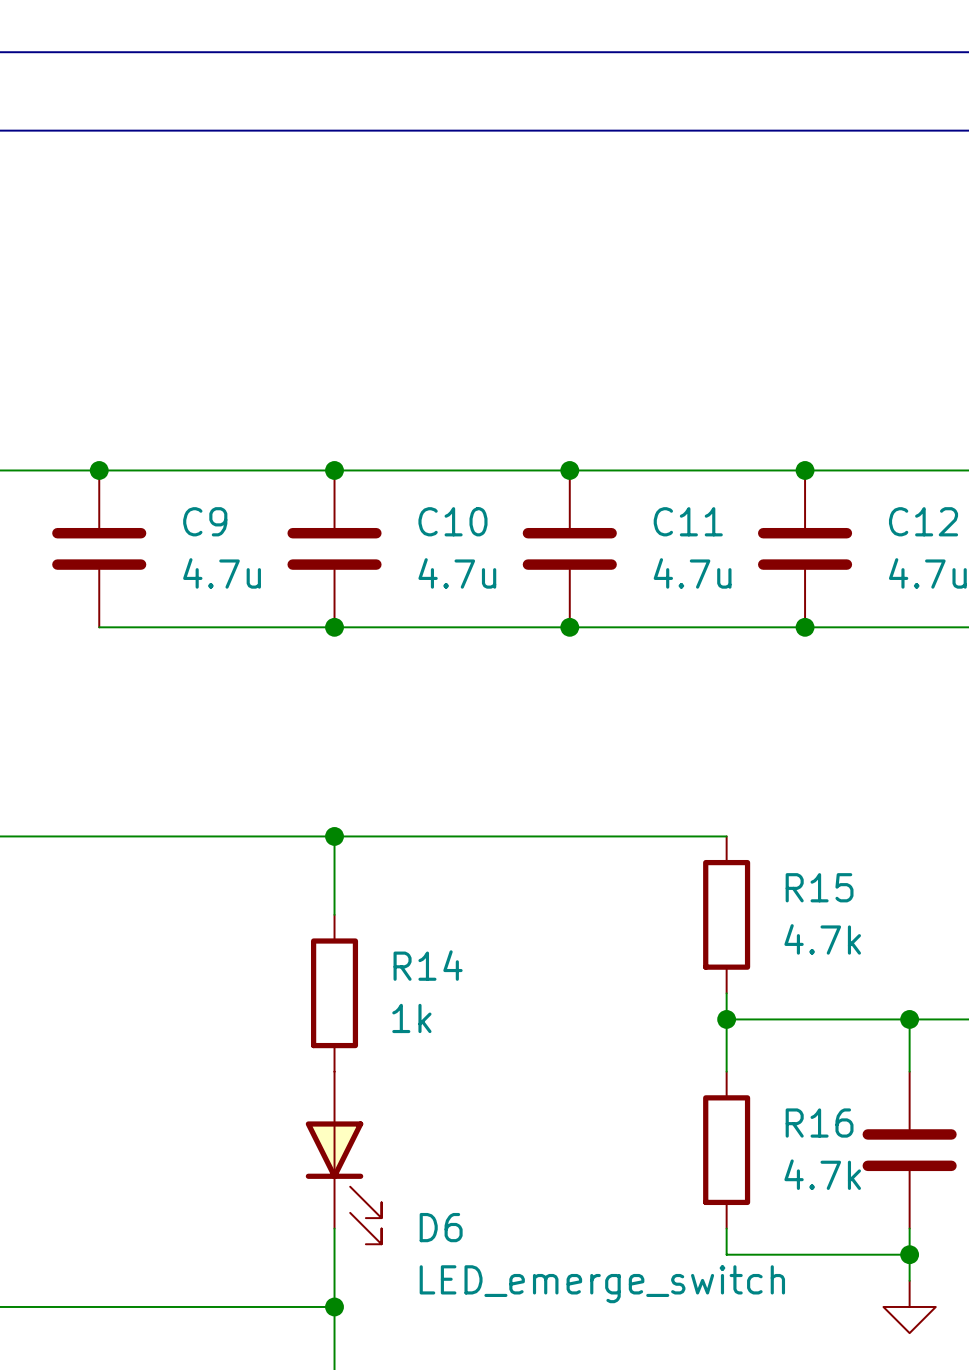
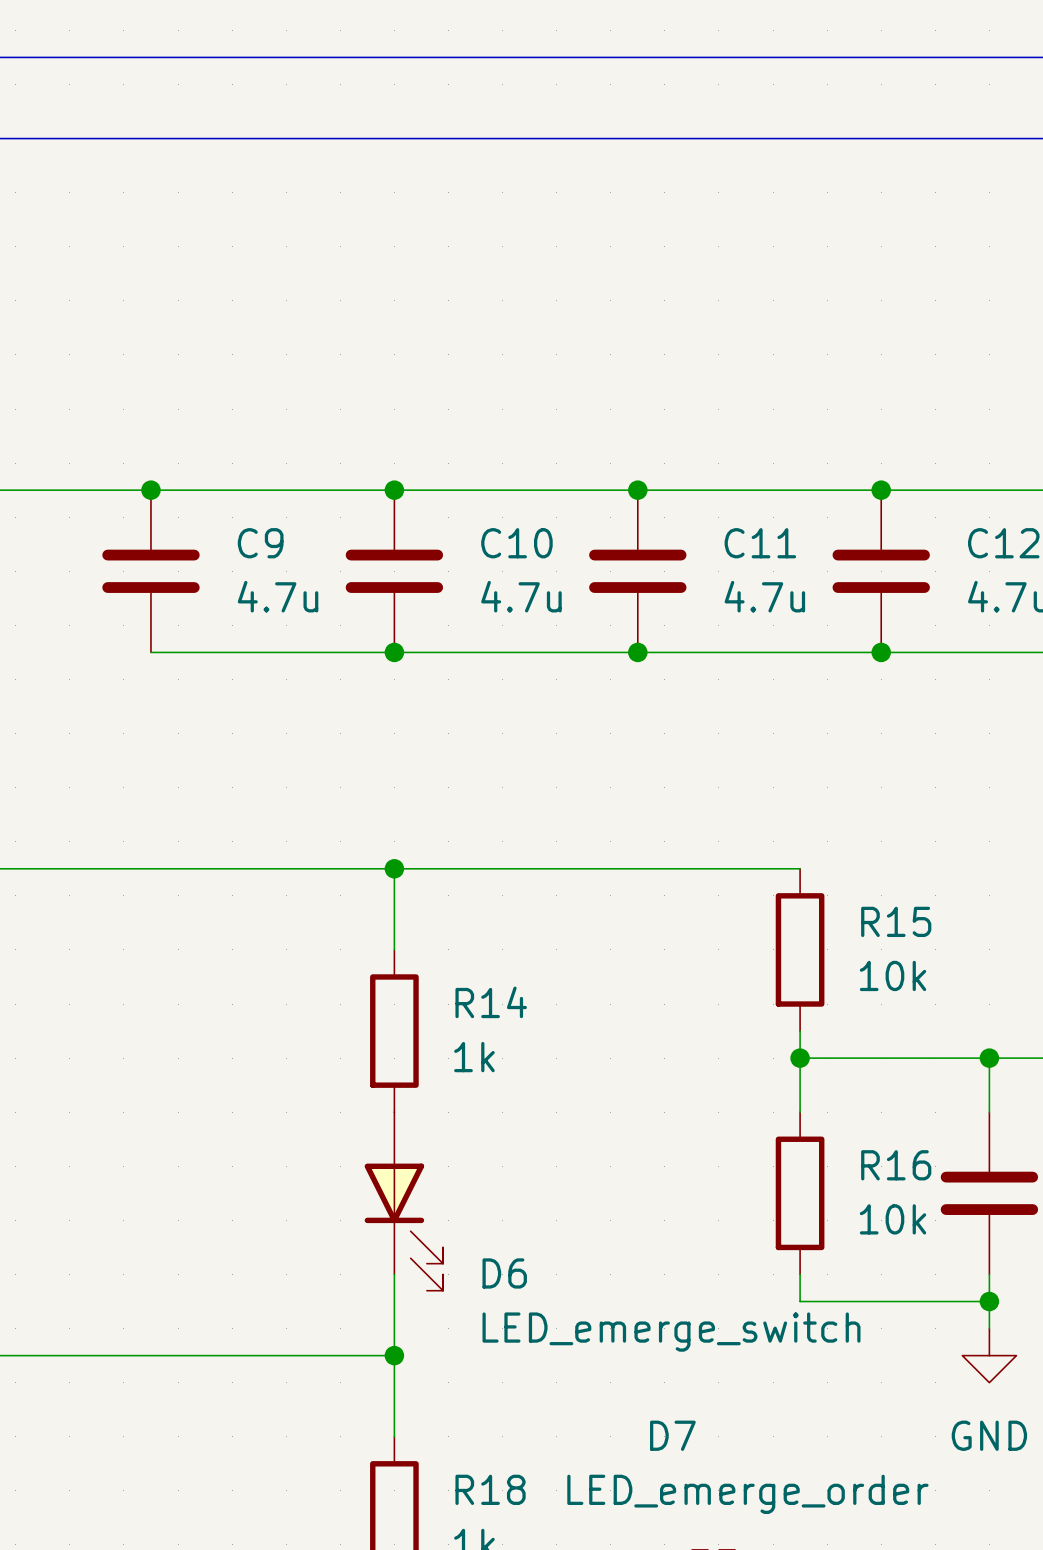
R15 value: 4.7k (822, 939) -> 10k (893, 975)
R16 value: 4.7k (822, 1174) -> 10k (893, 1219)

